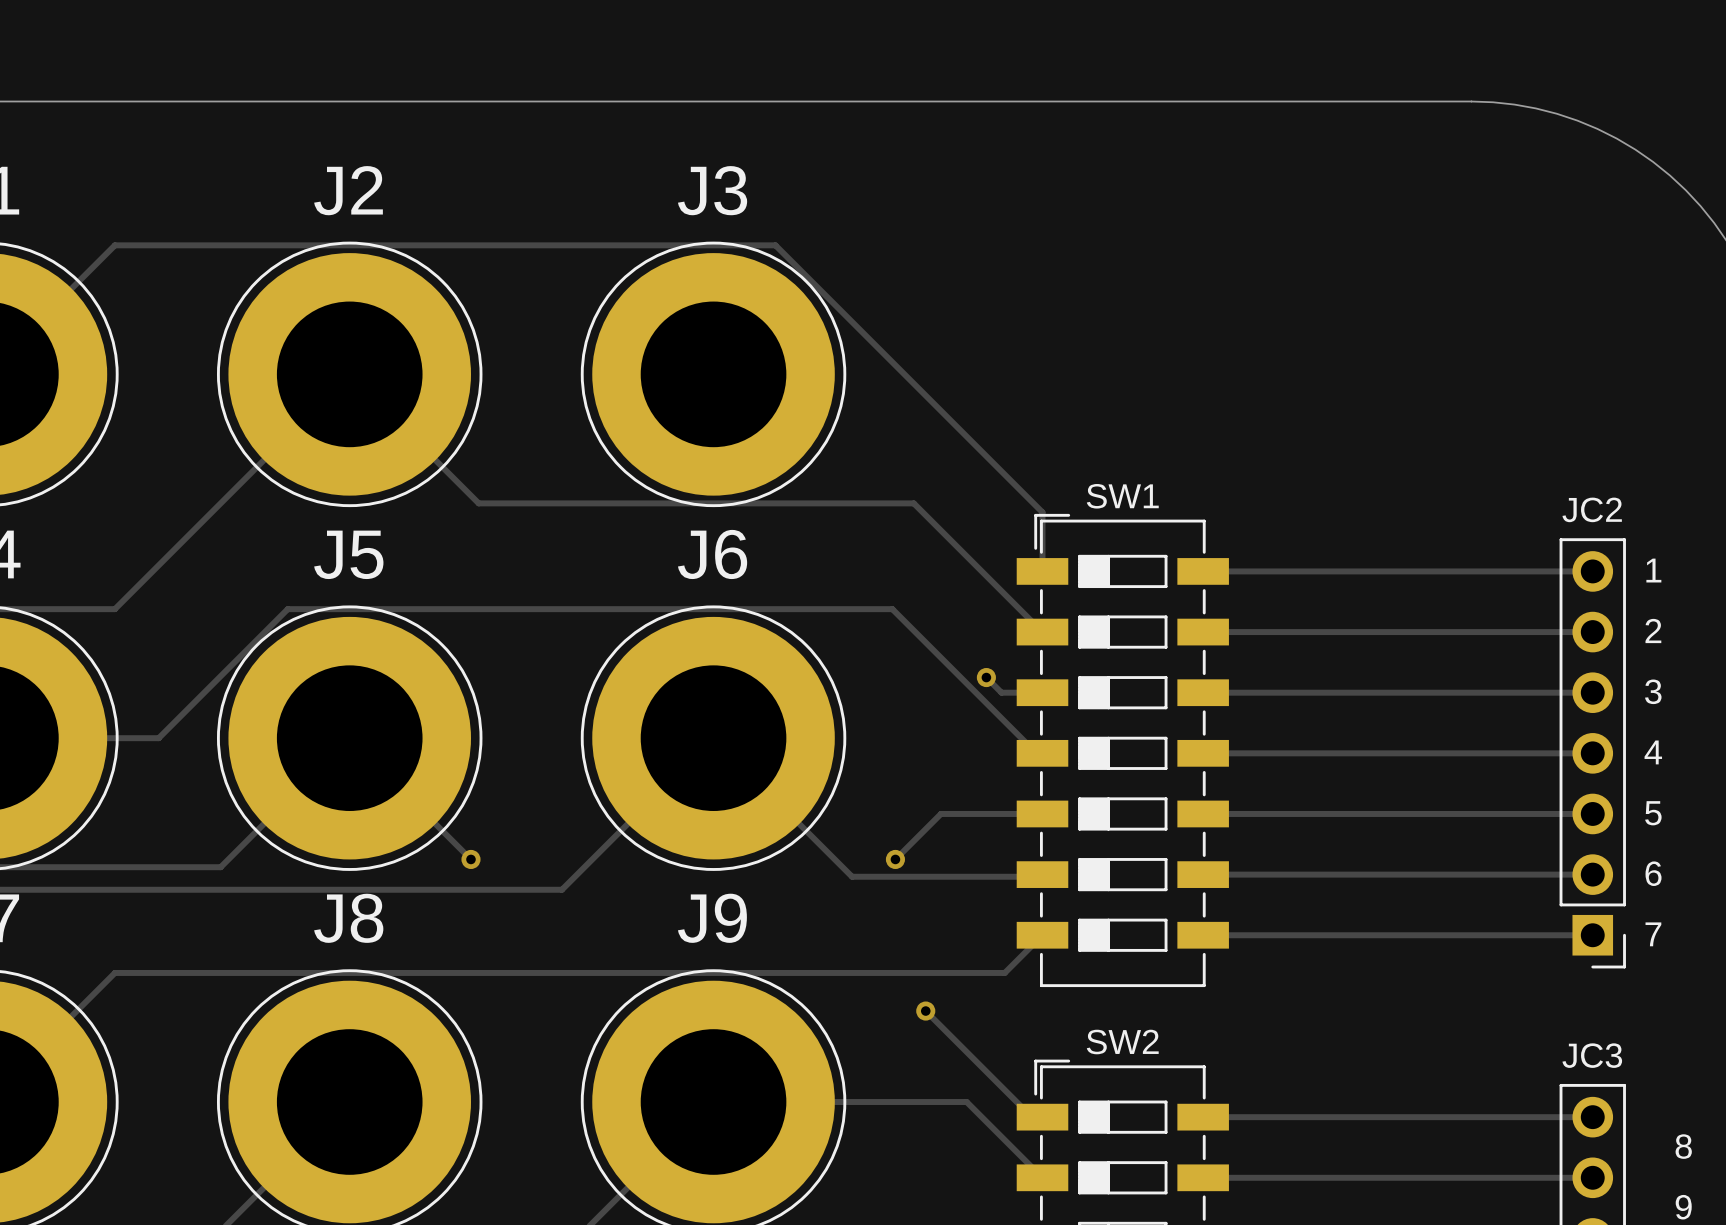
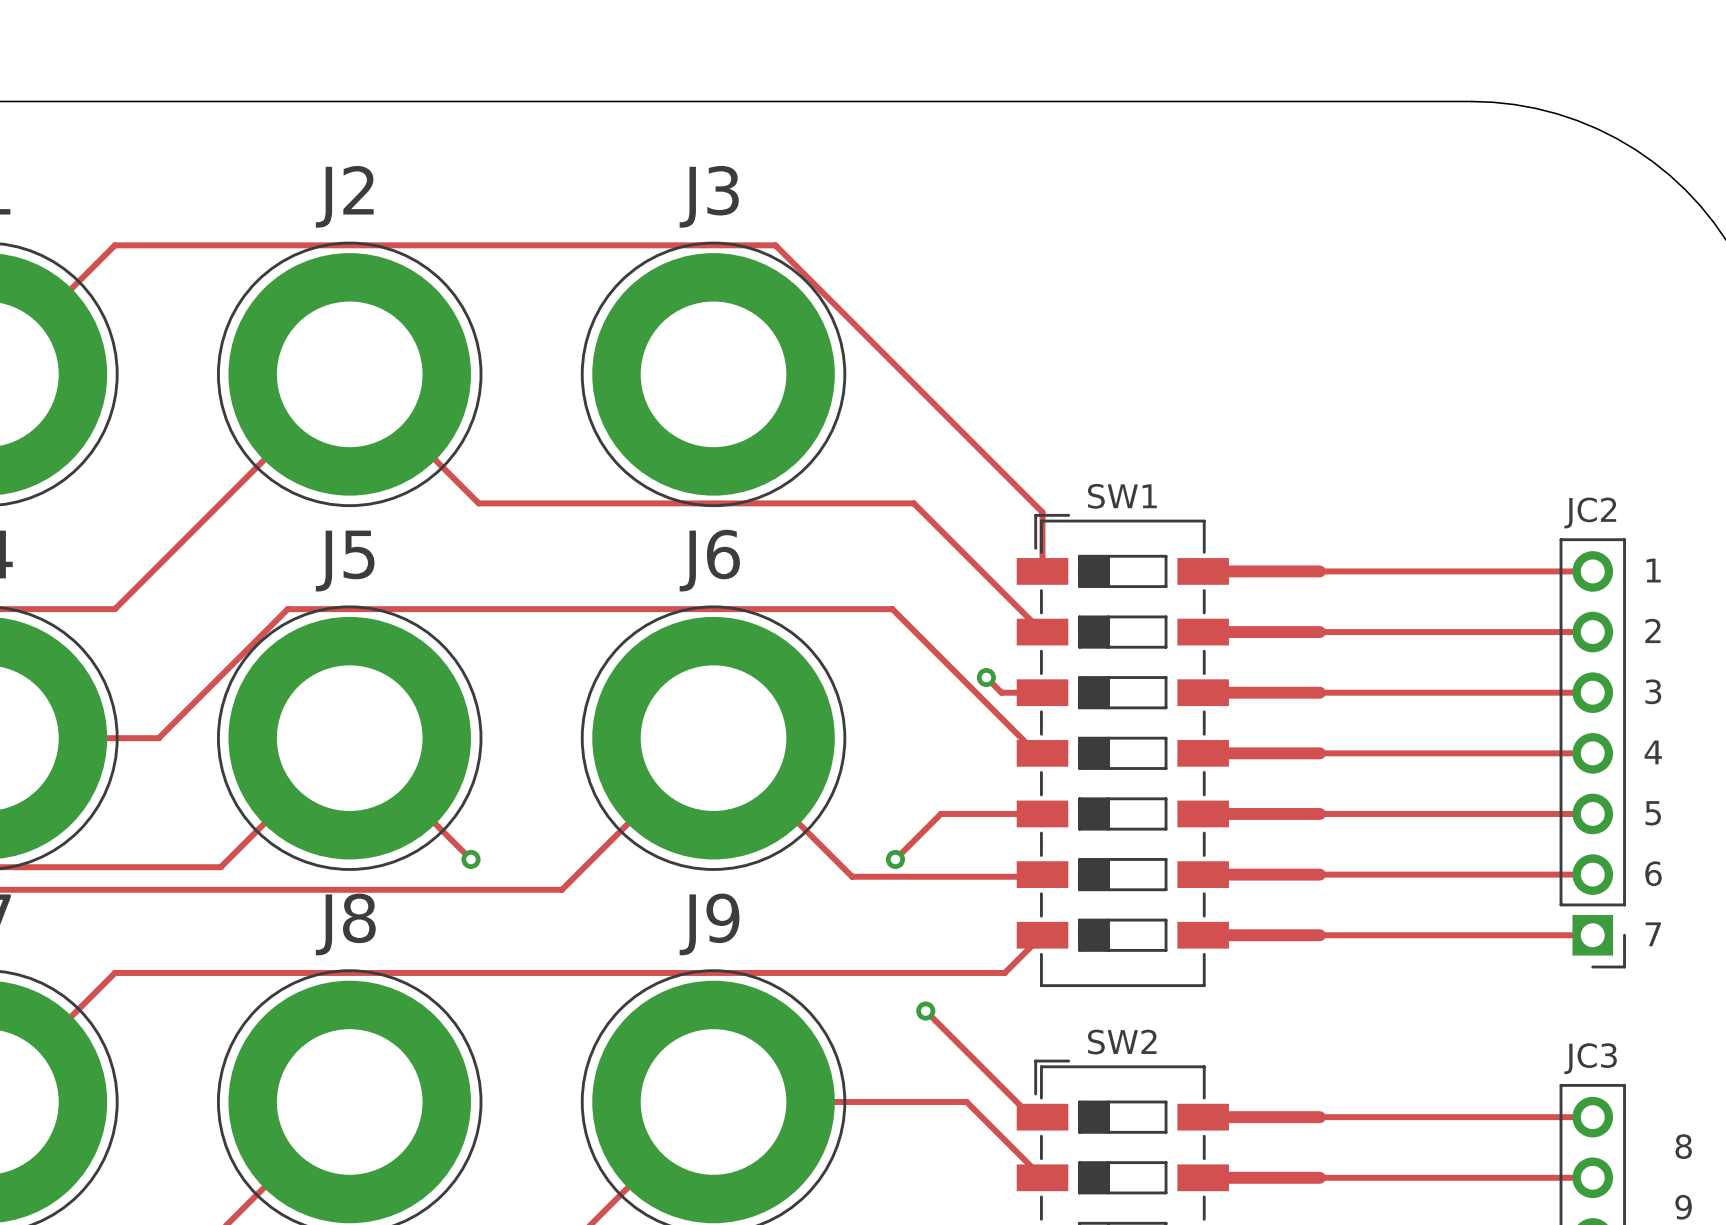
track width: thin (1203, 571) (1319, 571) -> thick (1203, 571) (1319, 571)
track width: thin (1203, 632) (1319, 632) -> thick (1203, 632) (1319, 632)
track width: thin (1203, 692) (1319, 692) -> thick (1203, 692) (1319, 692)
track width: thin (1203, 753) (1319, 753) -> thick (1203, 753) (1319, 753)
track width: thin (1203, 813) (1319, 813) -> thick (1203, 813) (1319, 813)
track width: thin (1203, 874) (1319, 874) -> thick (1203, 874) (1319, 874)
track width: thin (1203, 935) (1319, 935) -> thick (1203, 935) (1319, 935)
track width: thin (1203, 1117) (1319, 1117) -> thick (1203, 1117) (1319, 1117)
track width: thin (1203, 1177) (1319, 1177) -> thick (1203, 1177) (1319, 1177)

